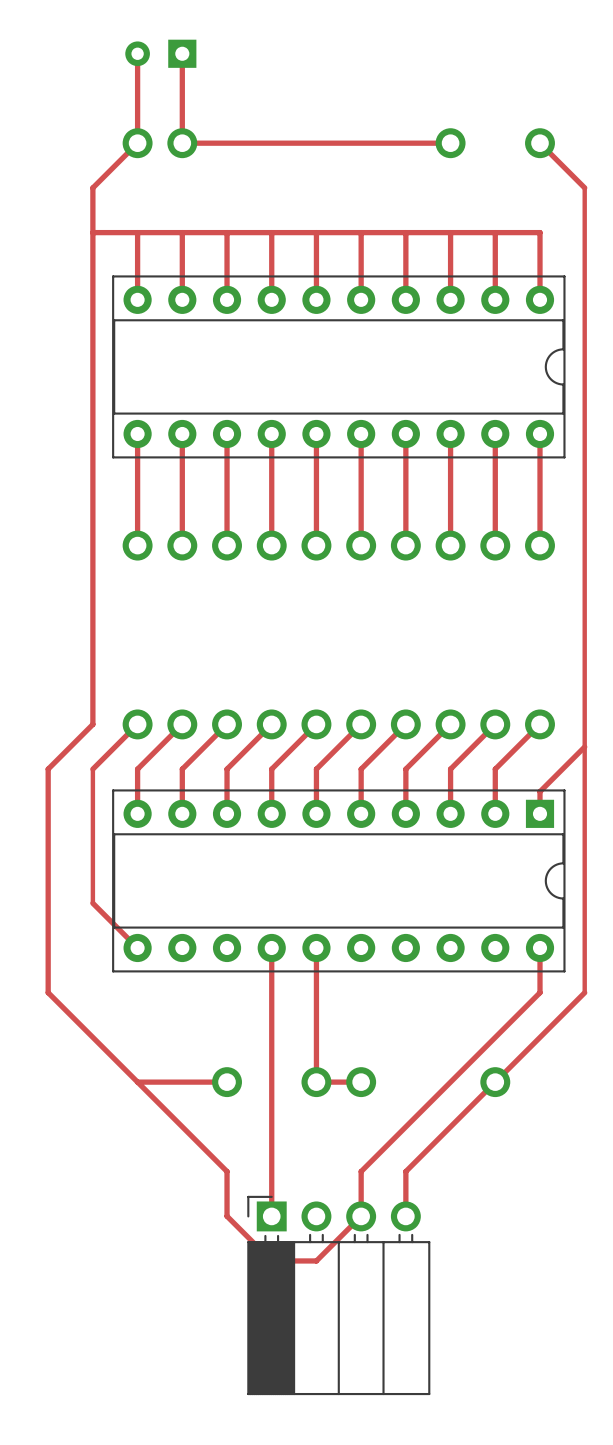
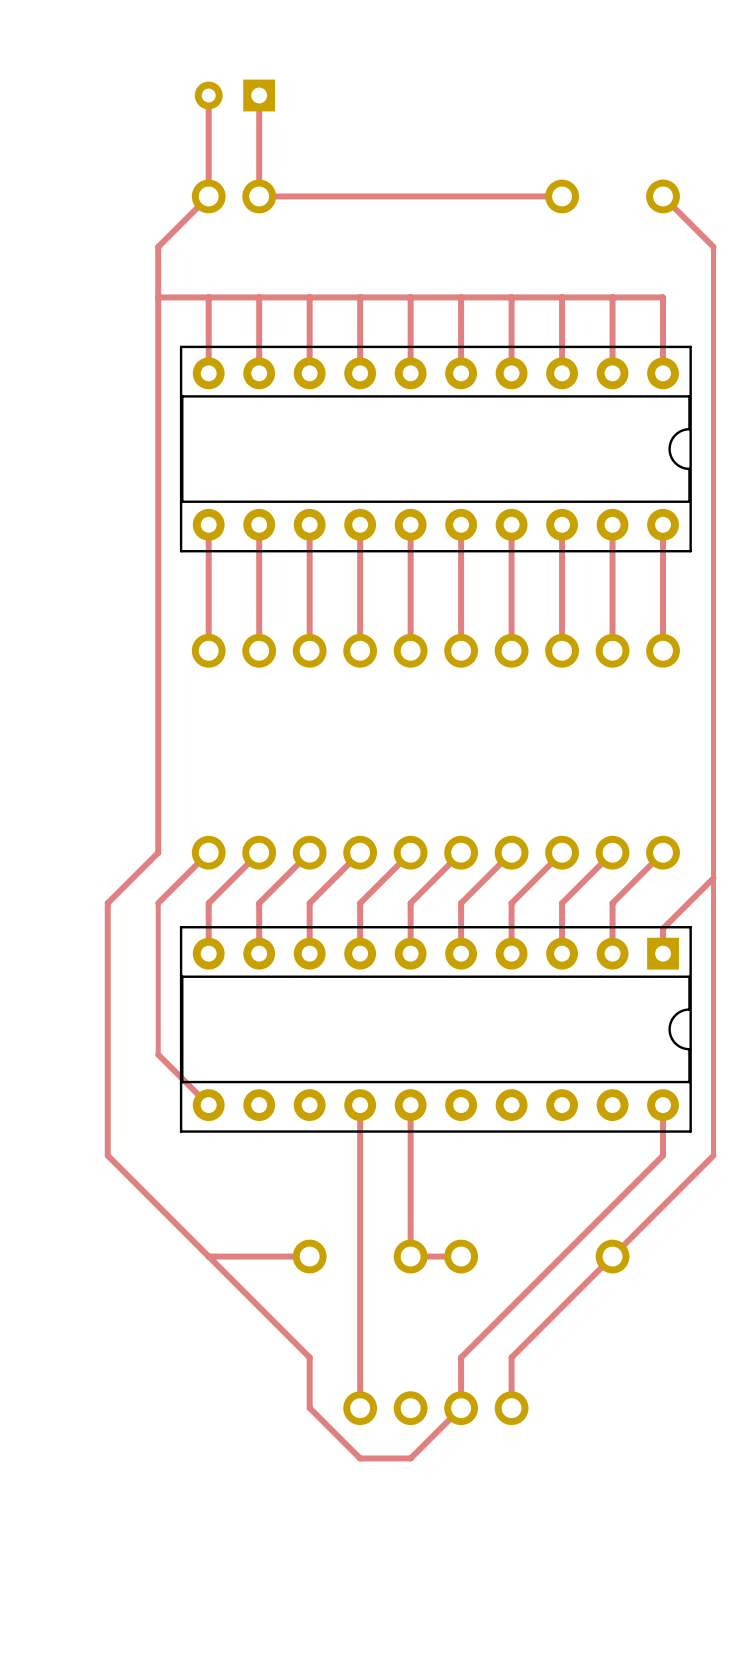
part: none -> (360, 1408)
part: (338, 1295) -> none

